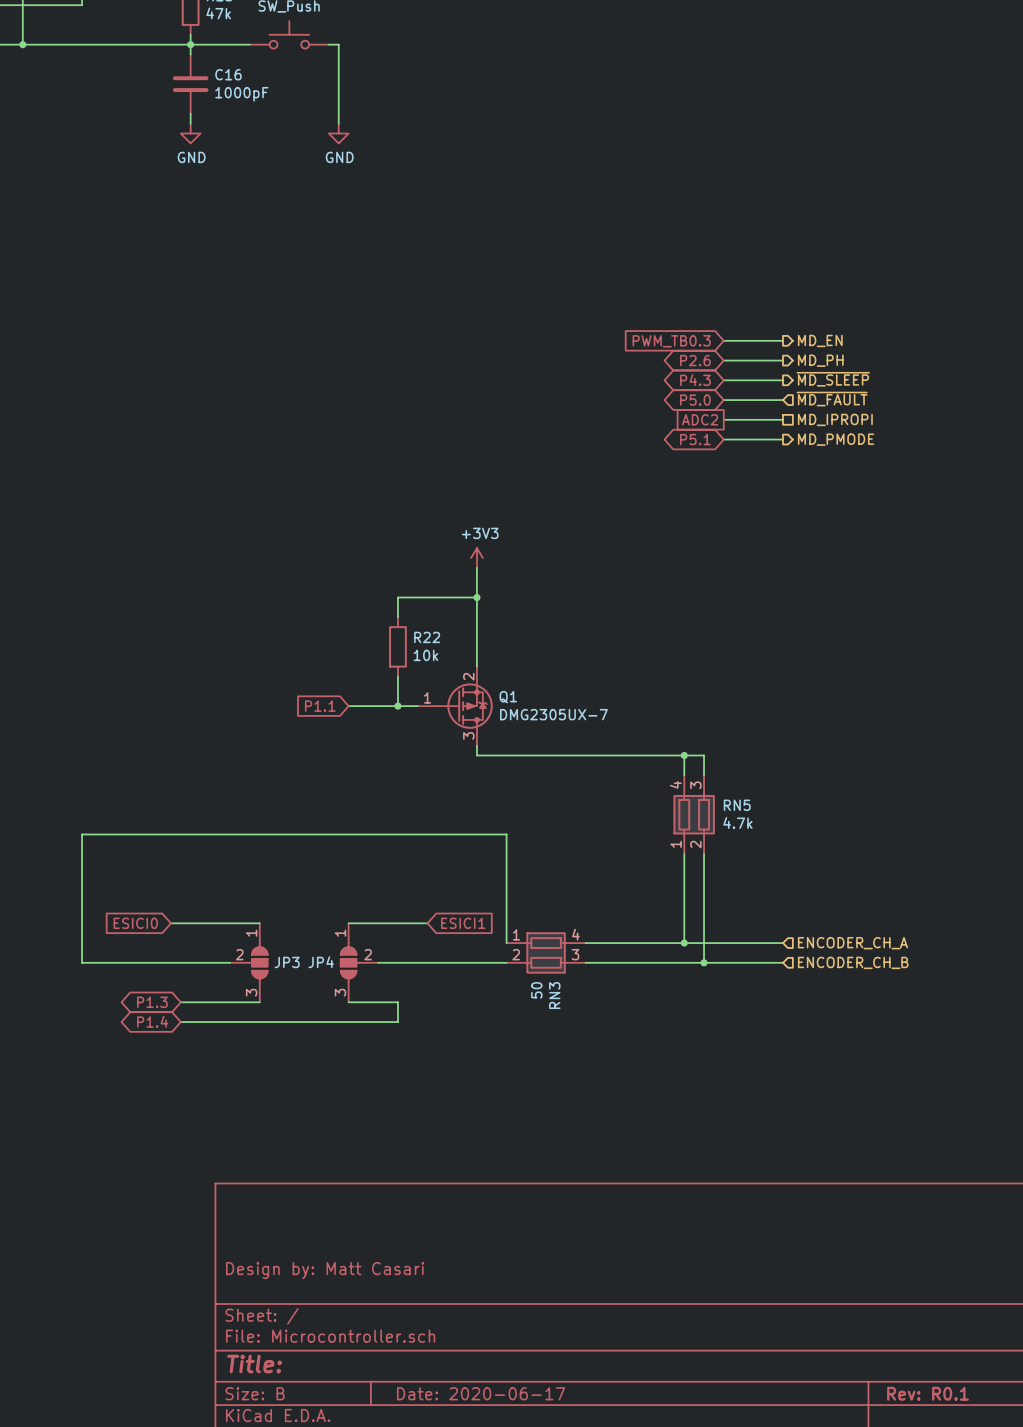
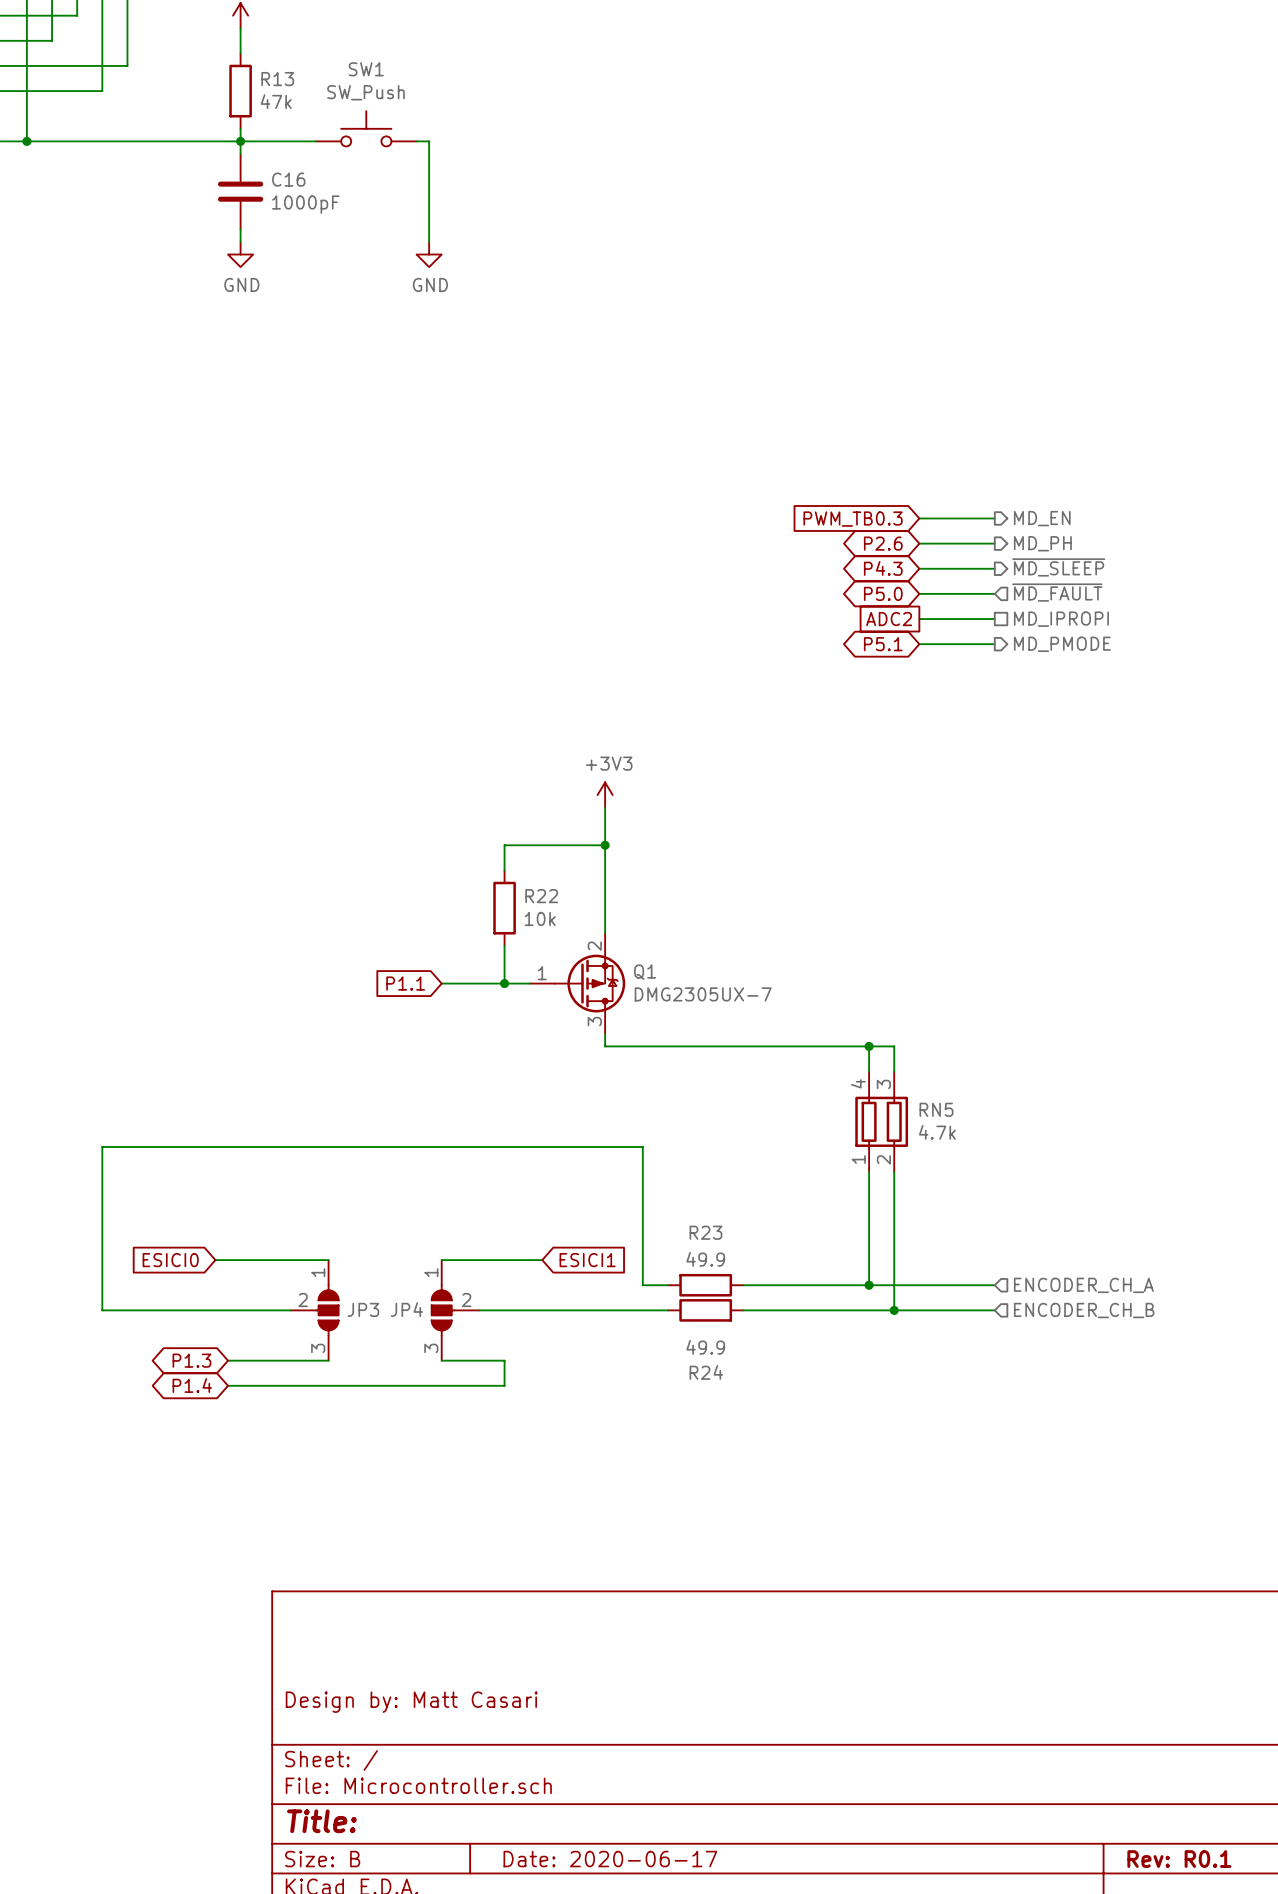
R23: none -> 49.9 (705, 1285)
RN3: 50 (546, 952) -> none
R24: none -> 49.9 (705, 1310)

